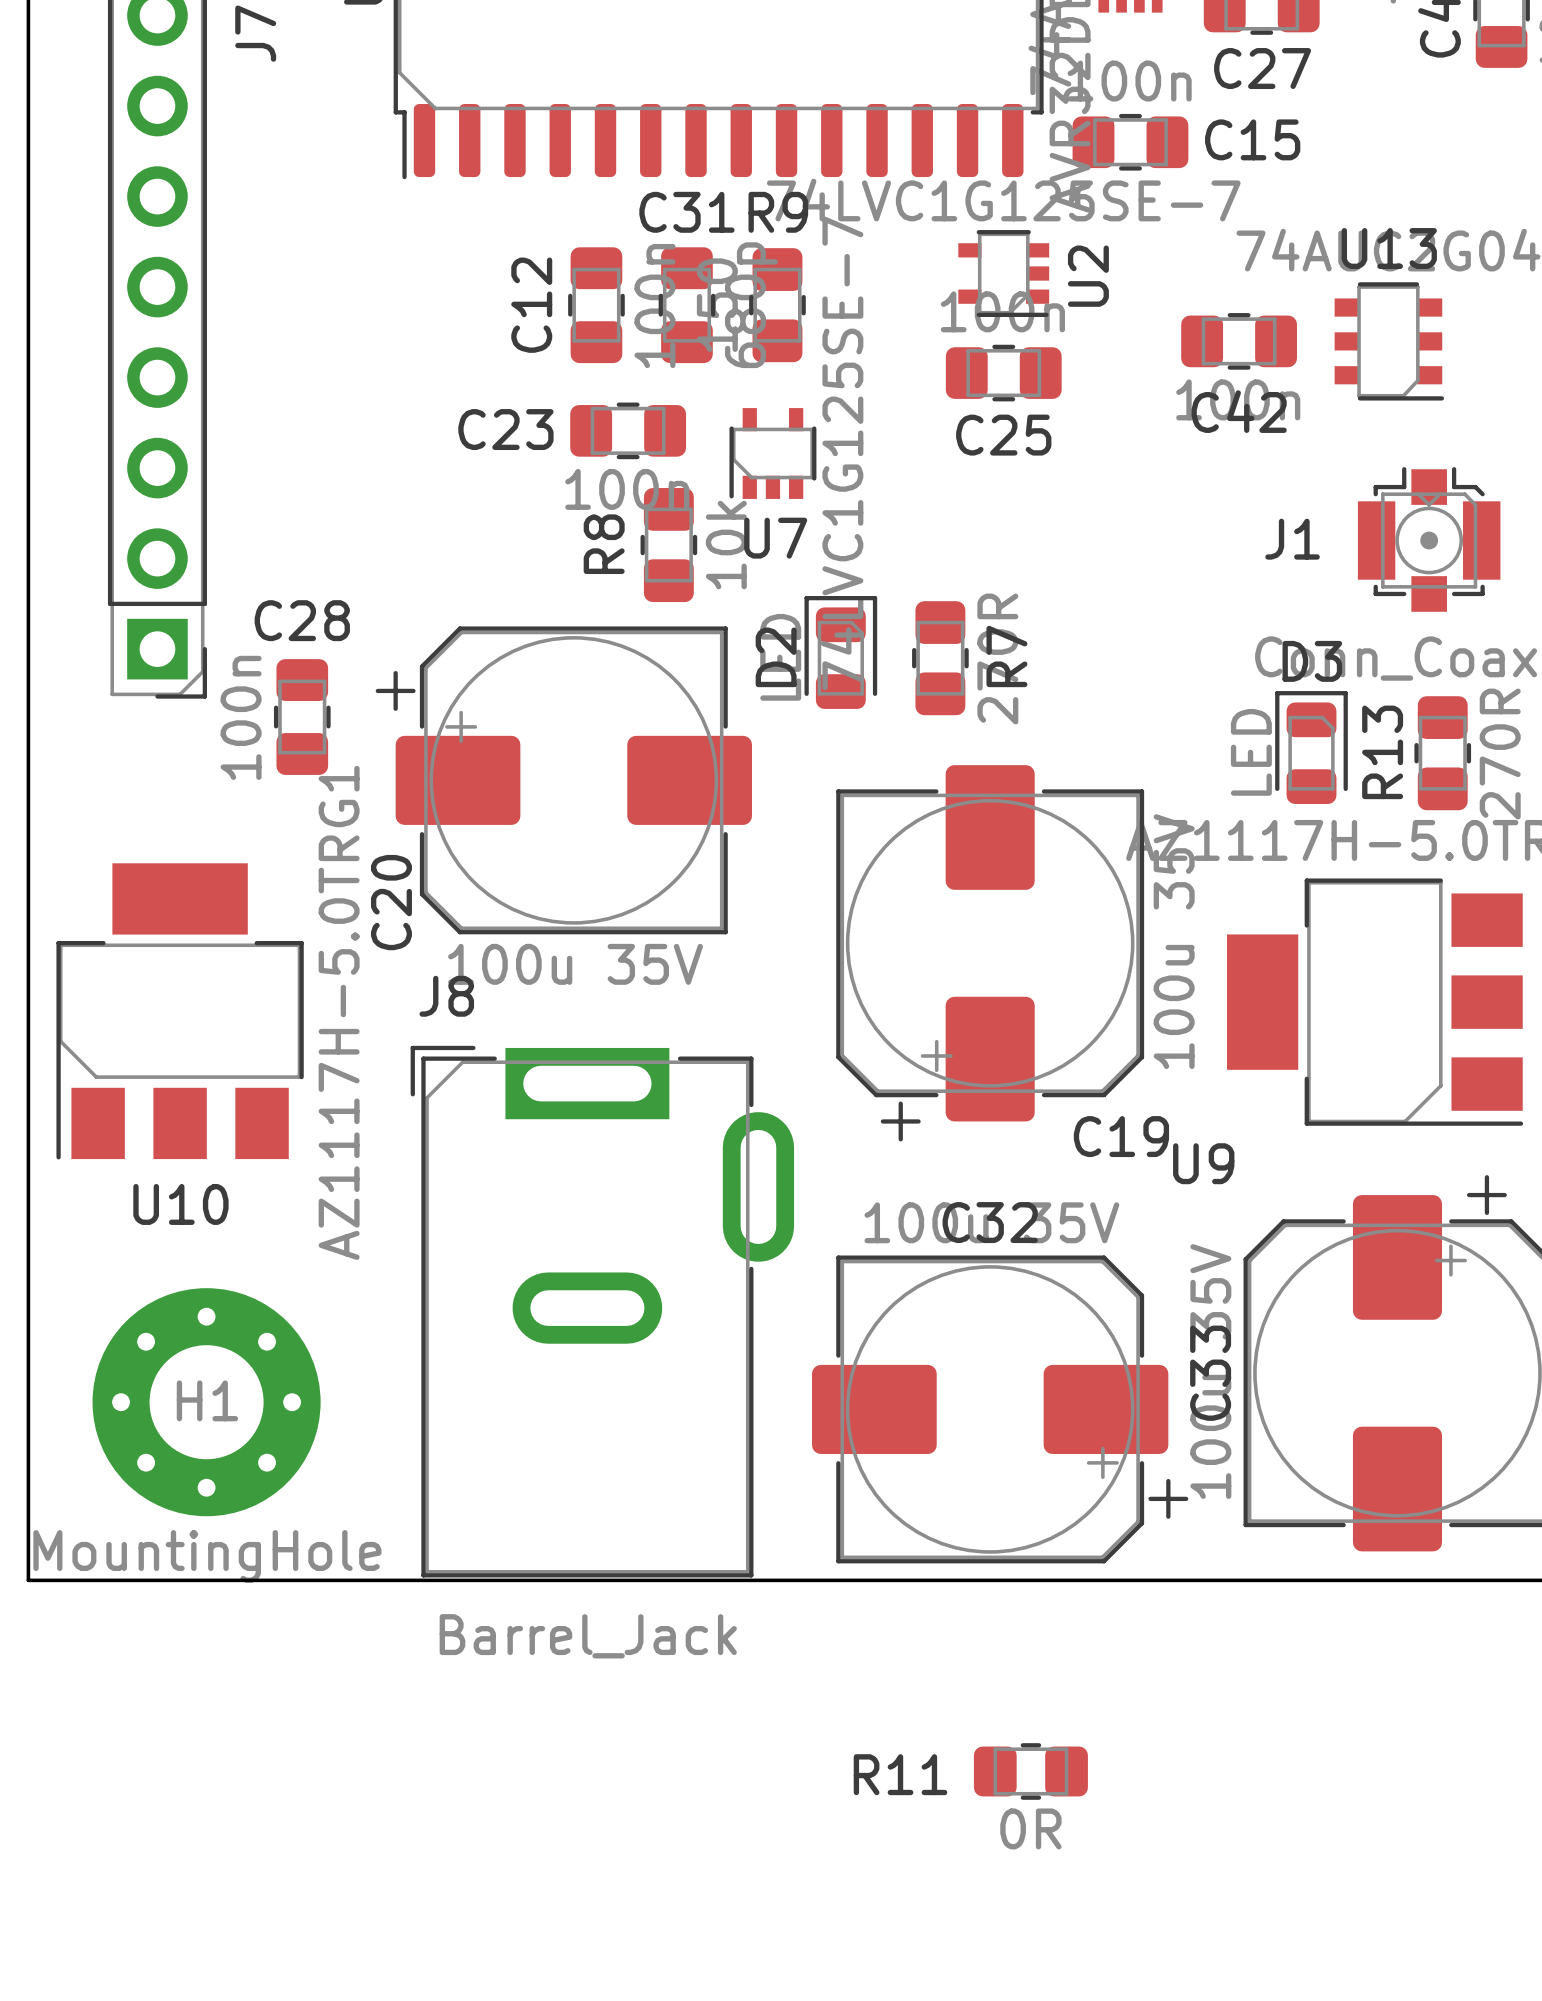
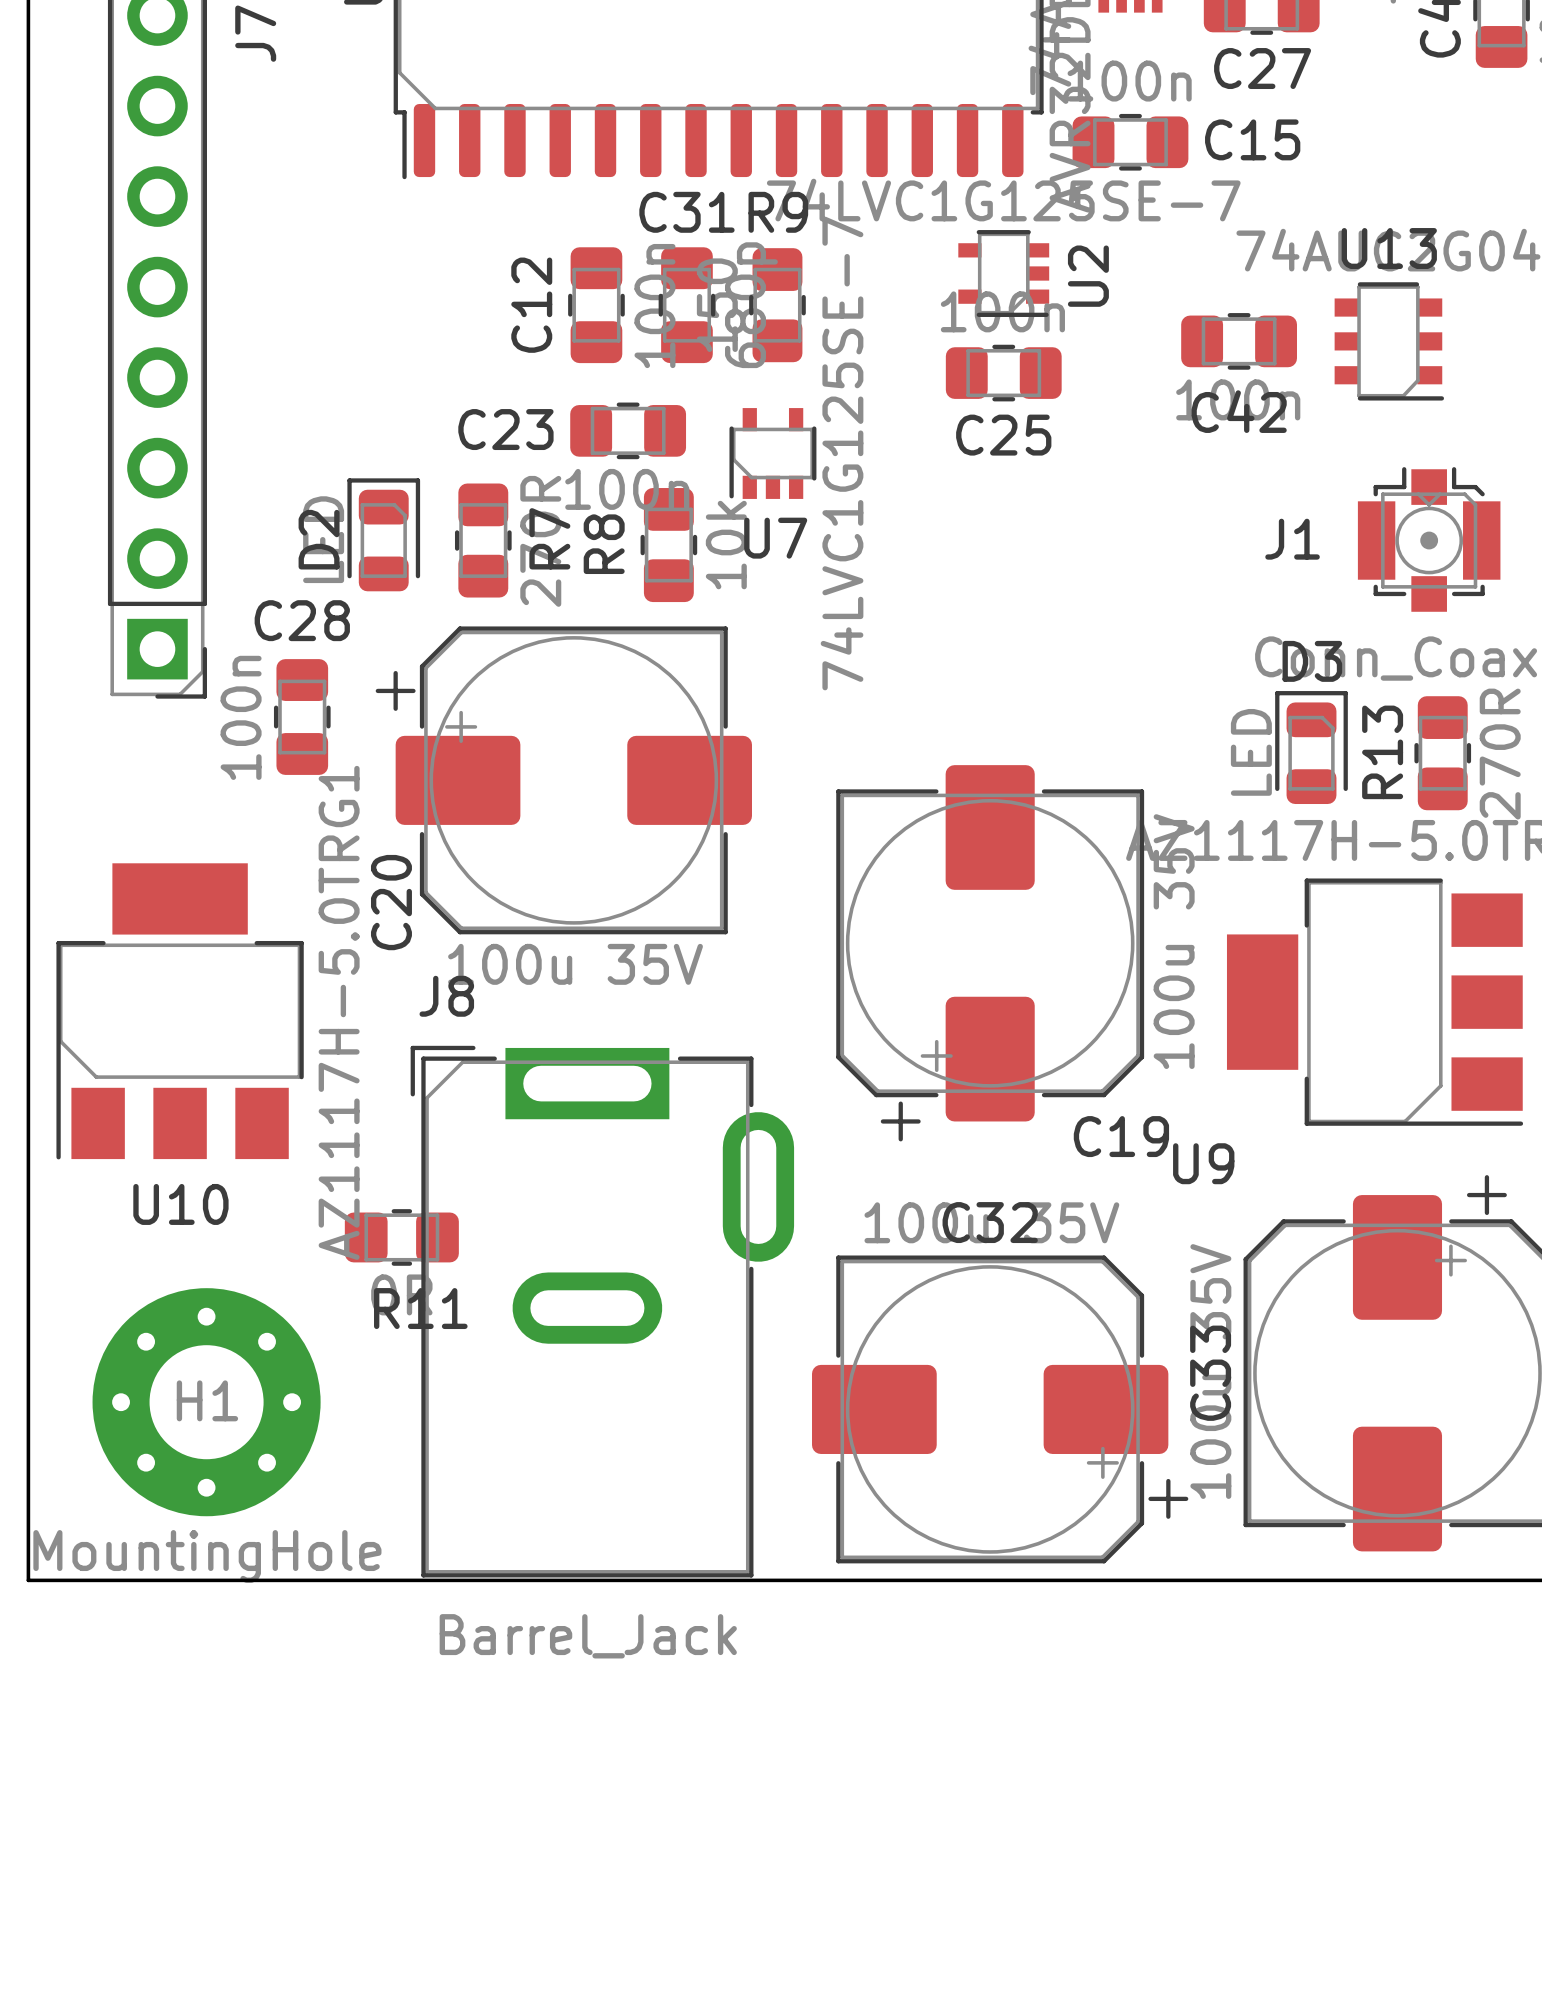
D2 position: (840, 652) -> (383, 534)
R7 position: (940, 658) -> (483, 540)
R11 position: (1030, 1771) -> (401, 1237)
R11 name position: R11 (900, 1774) -> R11 (420, 1308)

